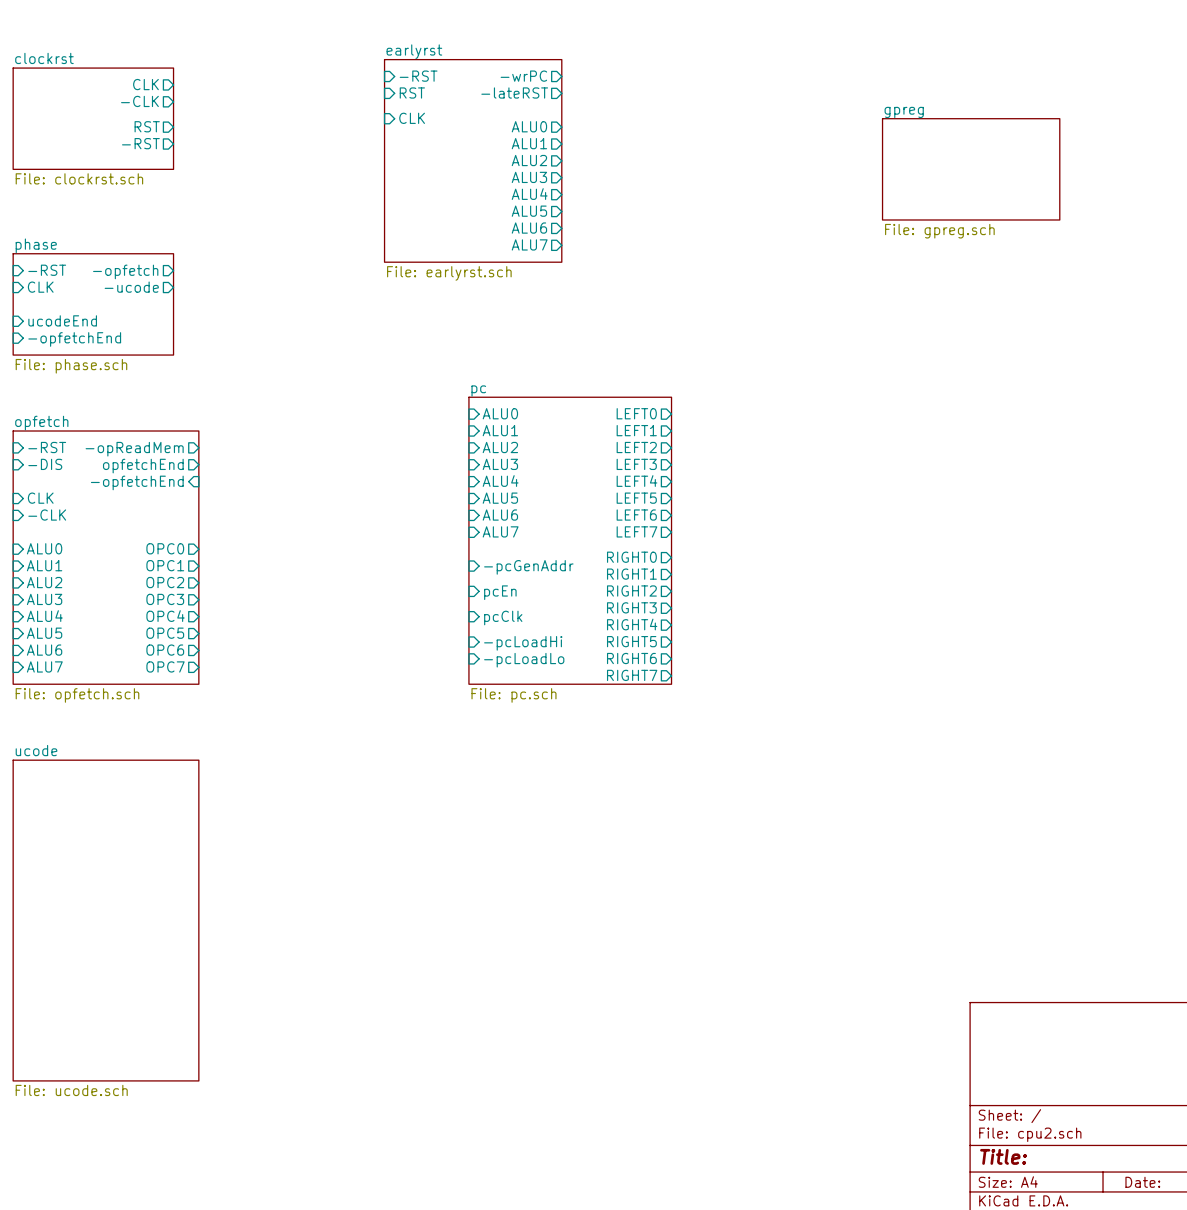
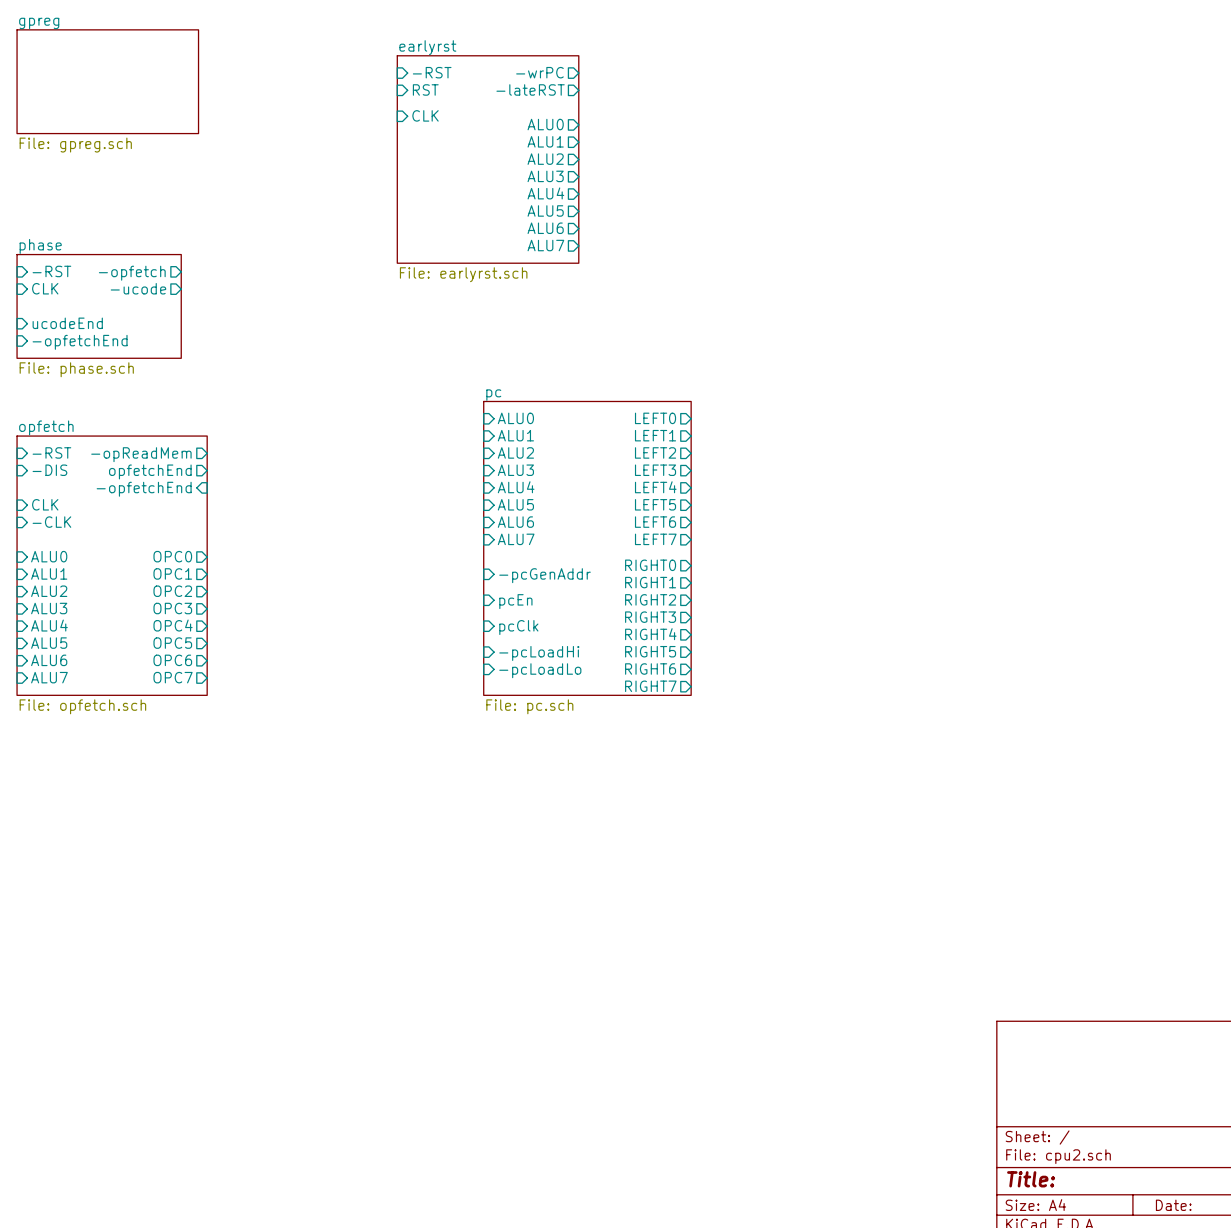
sheet gpreg: none -> File: gpreg.sch (107, 81)
sheet pin: CLK (145, 84) -> none
sheet pin: -CLK (139, 101) -> none
sheet clockrst: File: clockrst.sch (93, 118) -> none
sheet pin: RST (147, 126) -> none
sheet pin: -RST (140, 143) -> none
sheet gpreg: File: gpreg.sch (971, 169) -> none
sheet ucode: File: ucode.sch (106, 920) -> none

